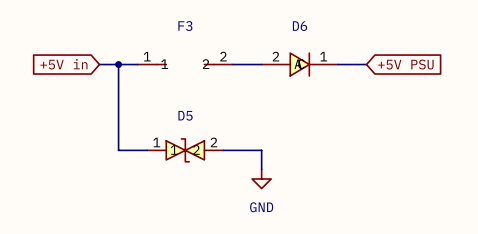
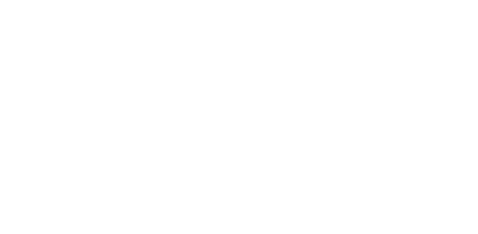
global label: +5V in (63, 64) -> none
wire: (99, 64) (137, 64) -> none
wire: (118, 64) (118, 150) (147, 150) -> none
junction: (118, 64) -> none
F3: (185, 64) -> none
wire: (233, 64) (261, 64) -> none
D6: (299, 64) -> none
wire: (337, 64) (366, 64) -> none
global label: +5V PSU (405, 64) -> none
D5: (185, 150) -> none
wire: (223, 150) (261, 150) (261, 169) -> none
power symbol: GND (261, 178) -> none

